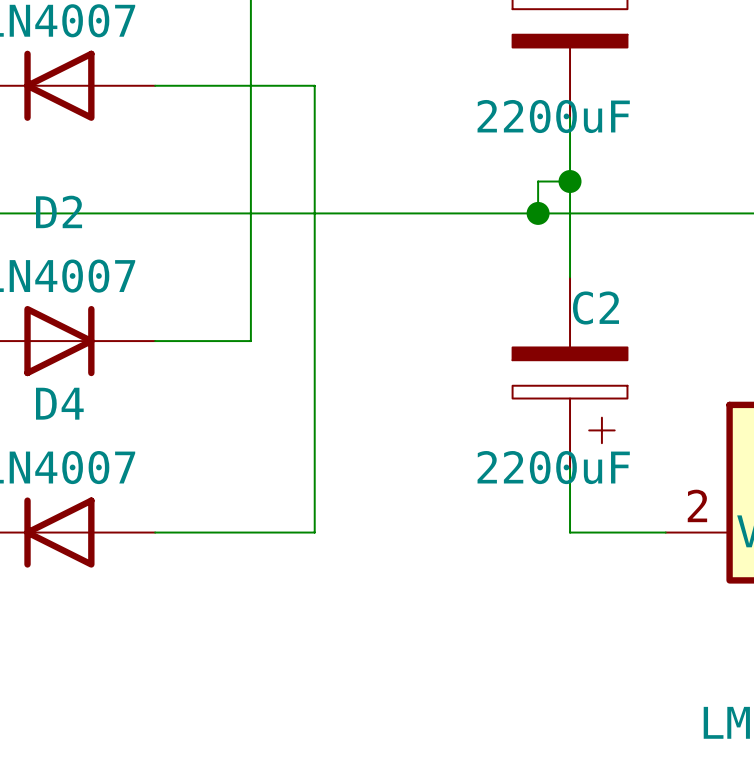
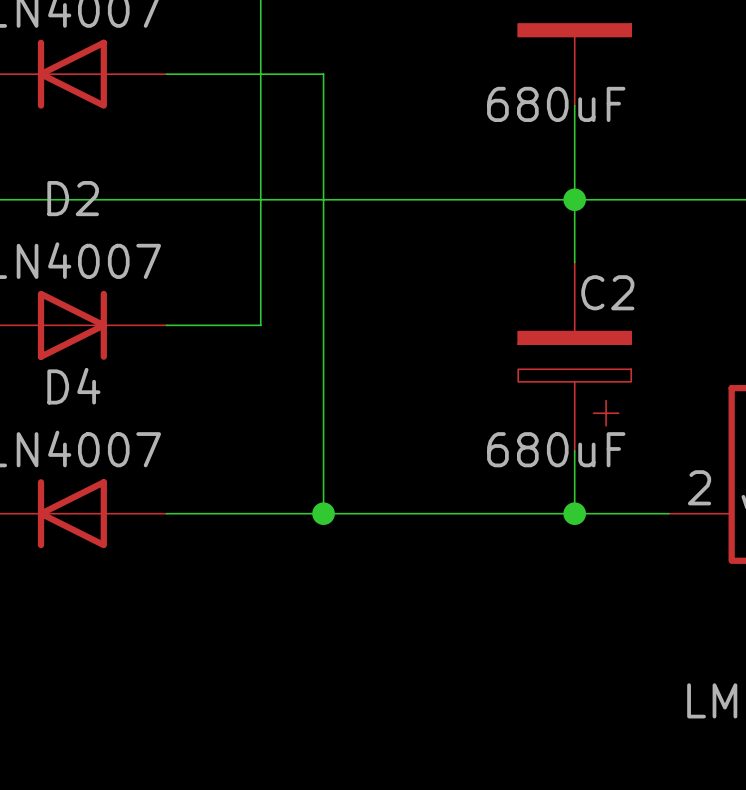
part value: 2200uF (553, 116) -> 680uF (556, 104)
wire: (570, 181) (538, 181) (538, 213) -> none
junction: (570, 181) -> none
junction: (538, 213) -> none
junction: none -> (574, 199)
C2 value: 2200uF (553, 467) -> 680uF (556, 449)
wire: none -> (323, 513) (574, 513)
junction: none -> (323, 513)
junction: none -> (574, 513)

